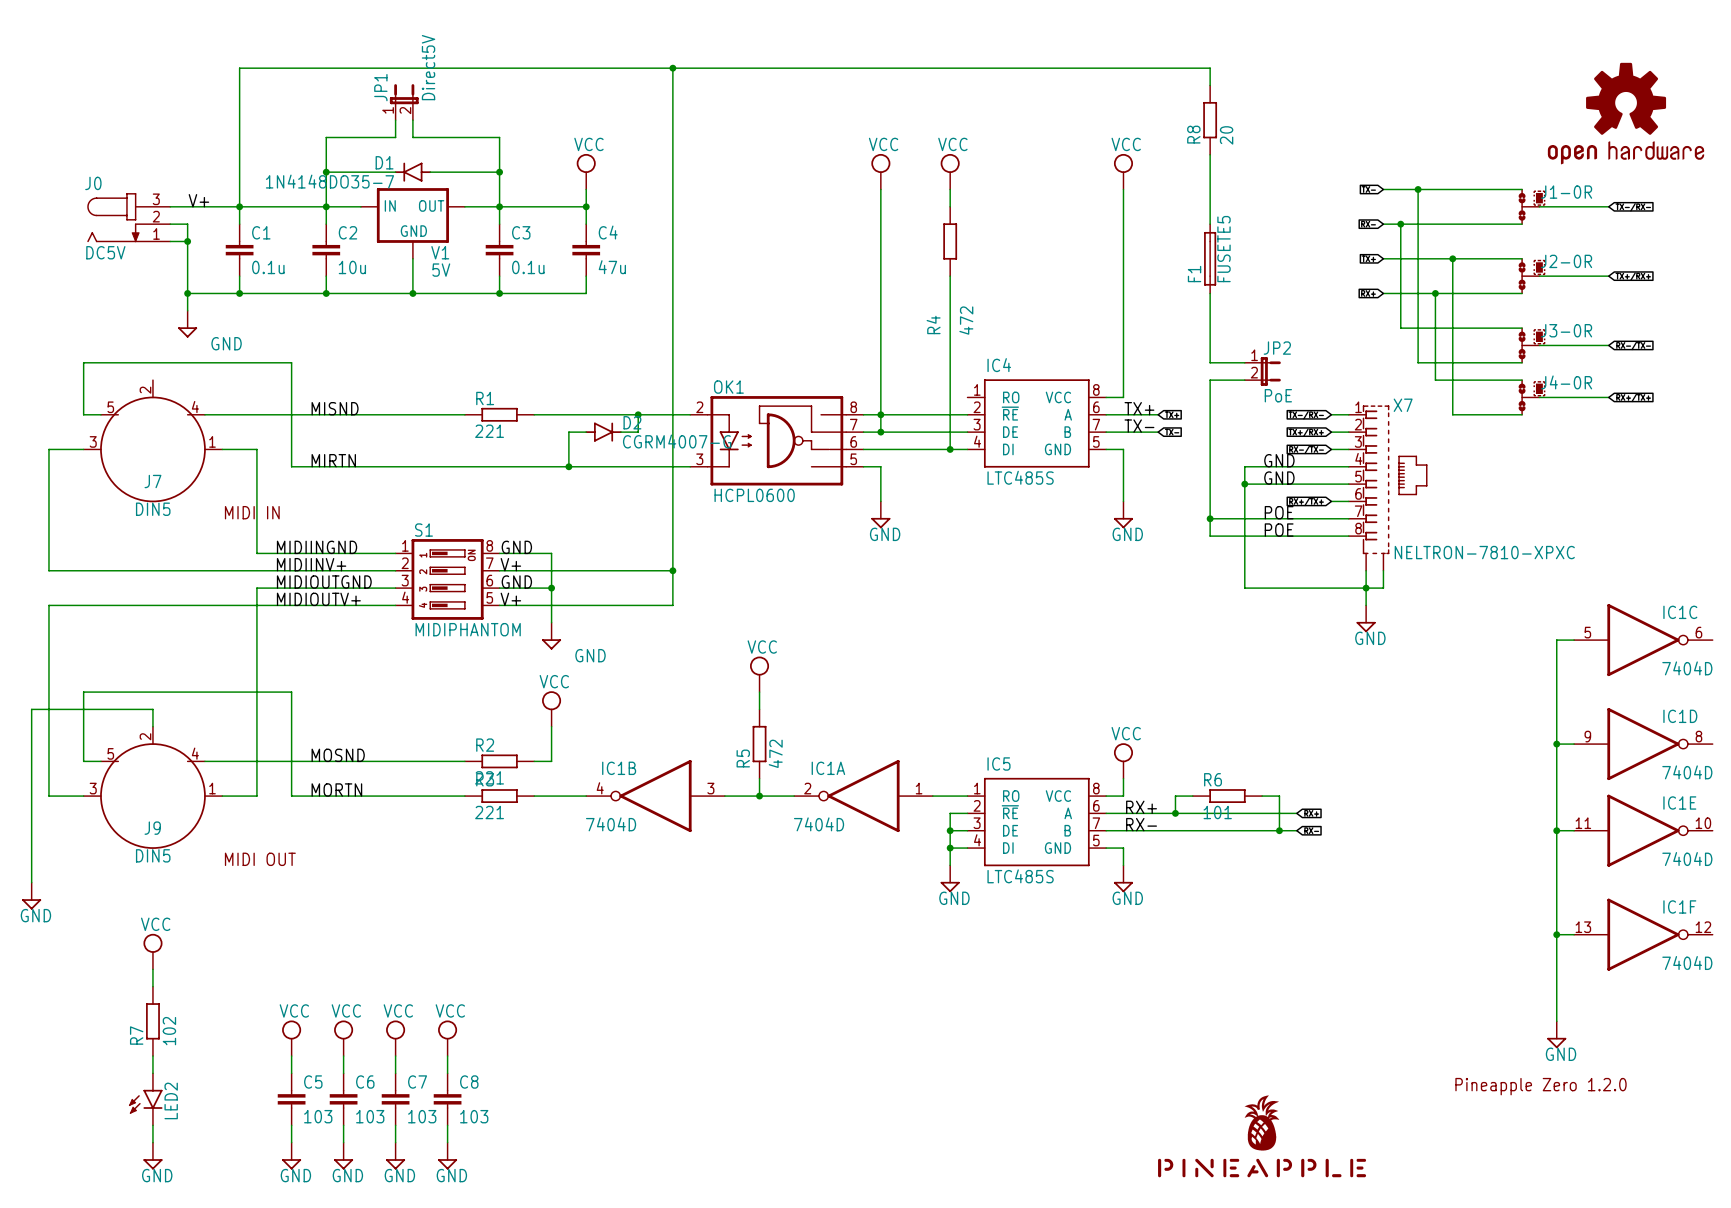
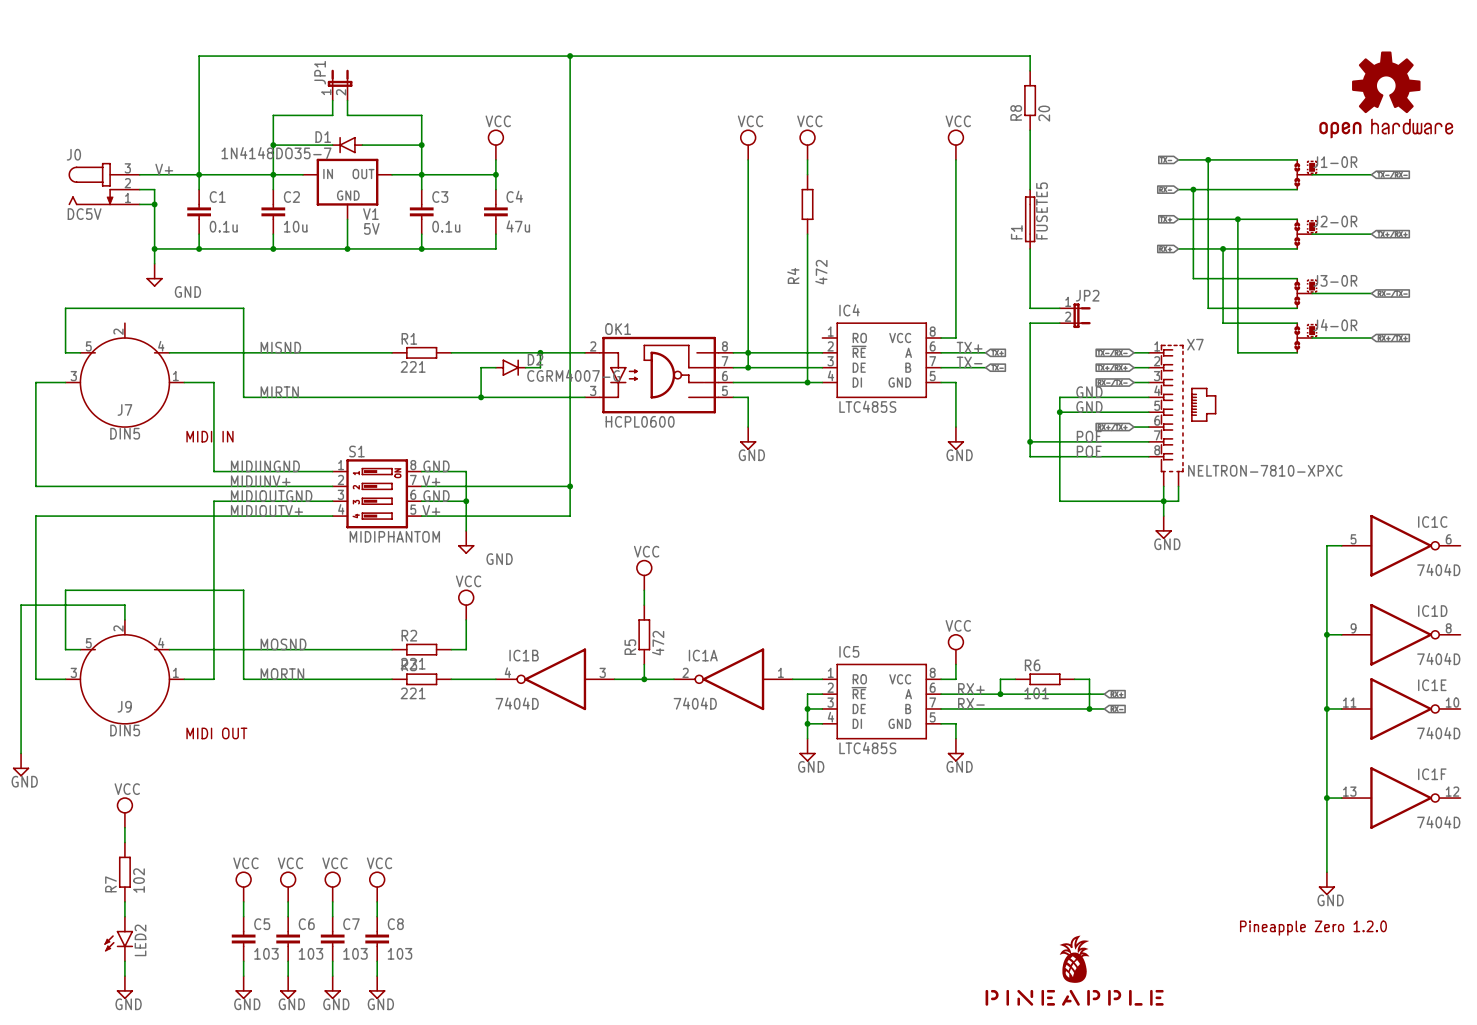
JP1 value: Direct5V (428, 67) -> none
JP2 value: PoE (1278, 395) -> none

